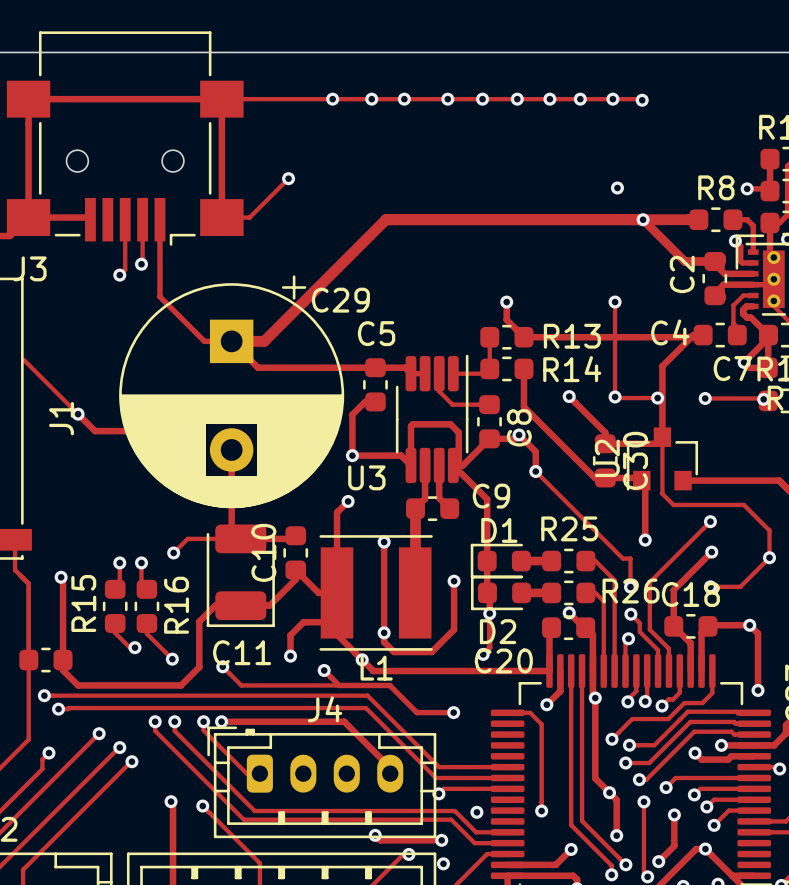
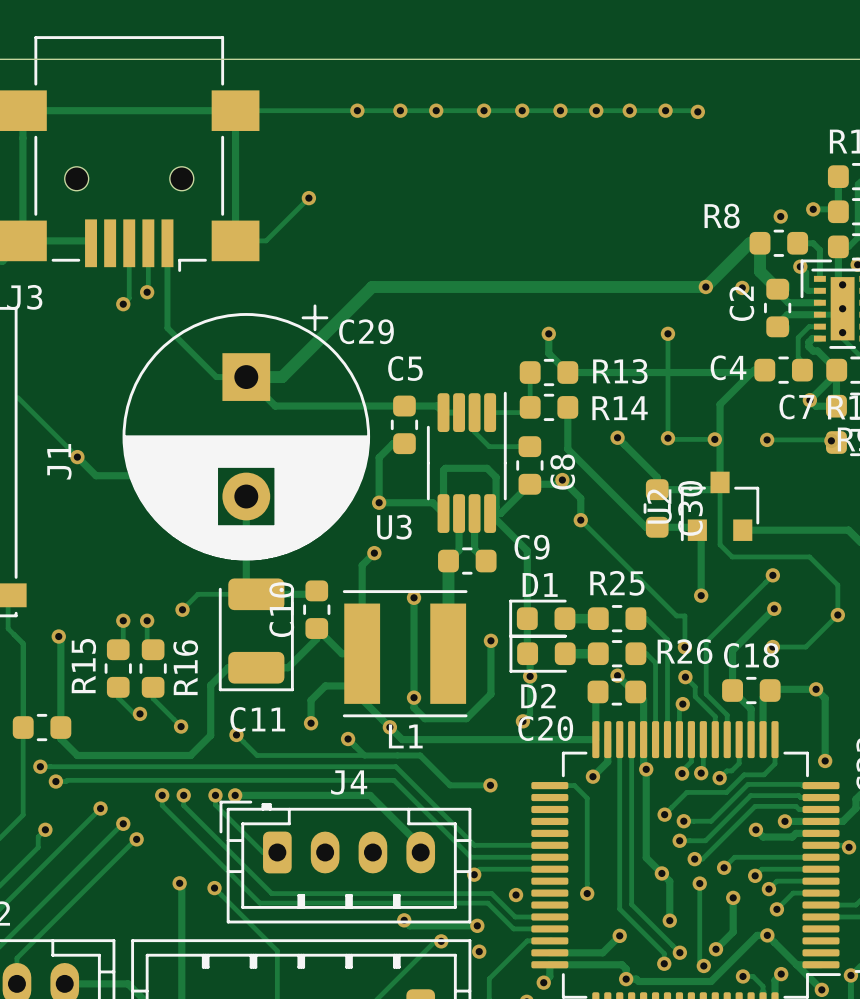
R8 name position: R8 (716, 187) -> R8 (722, 216)
via: (617, 188) -> none
via: none -> (780, 216)
track: (643, 219) (684, 261) (714, 261) -> (760, 243) (760, 271) (777, 289)
via: (643, 219) -> none
track: (689, 219) (385, 219) (346, 259) -> (749, 243) (705, 286) (372, 286)
via: none -> (705, 286)
via: none -> (742, 287)

